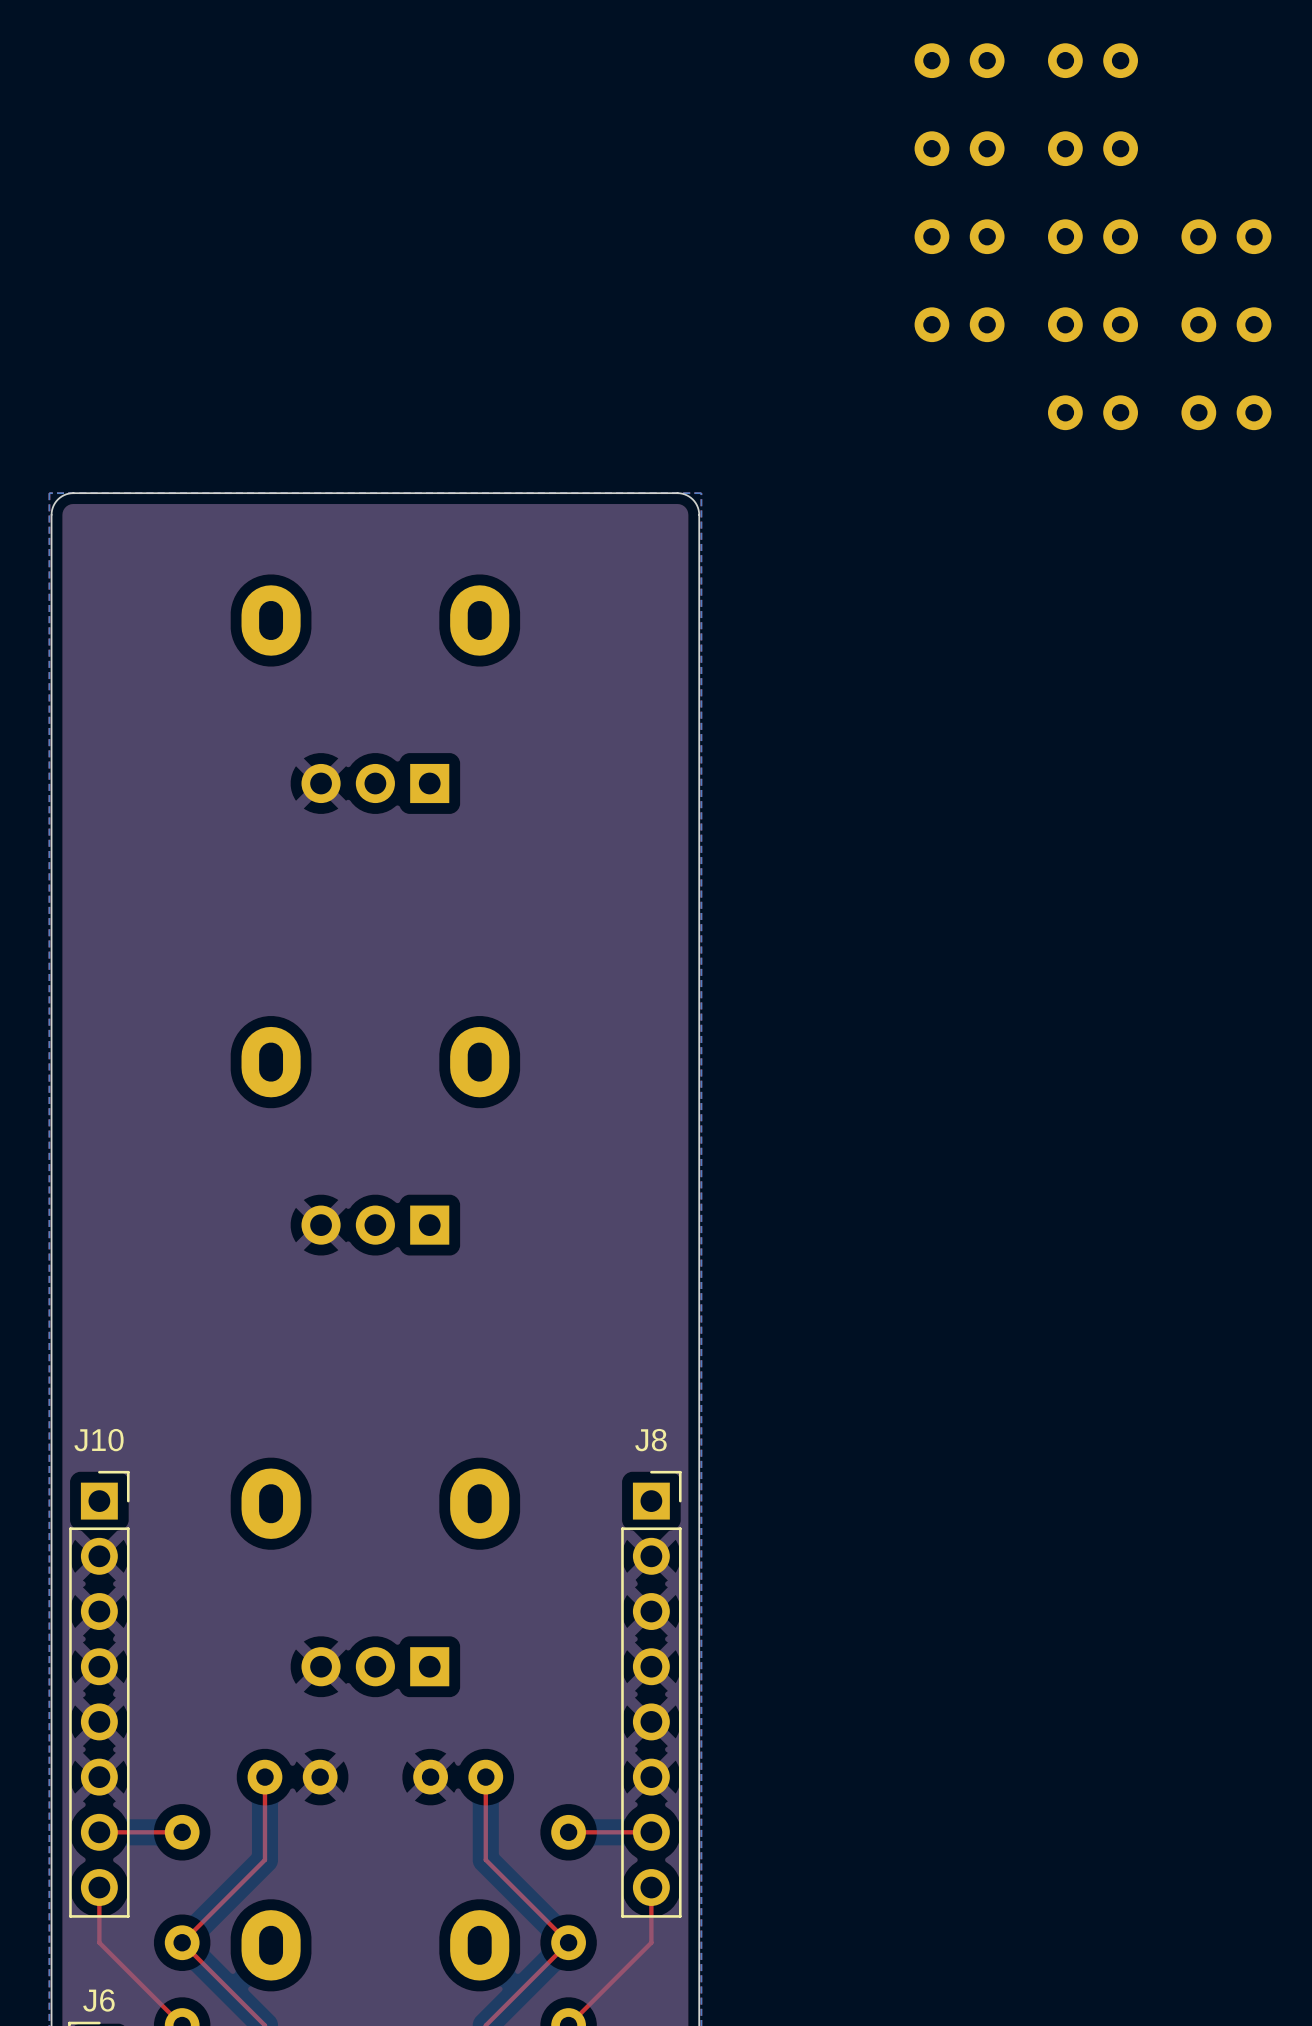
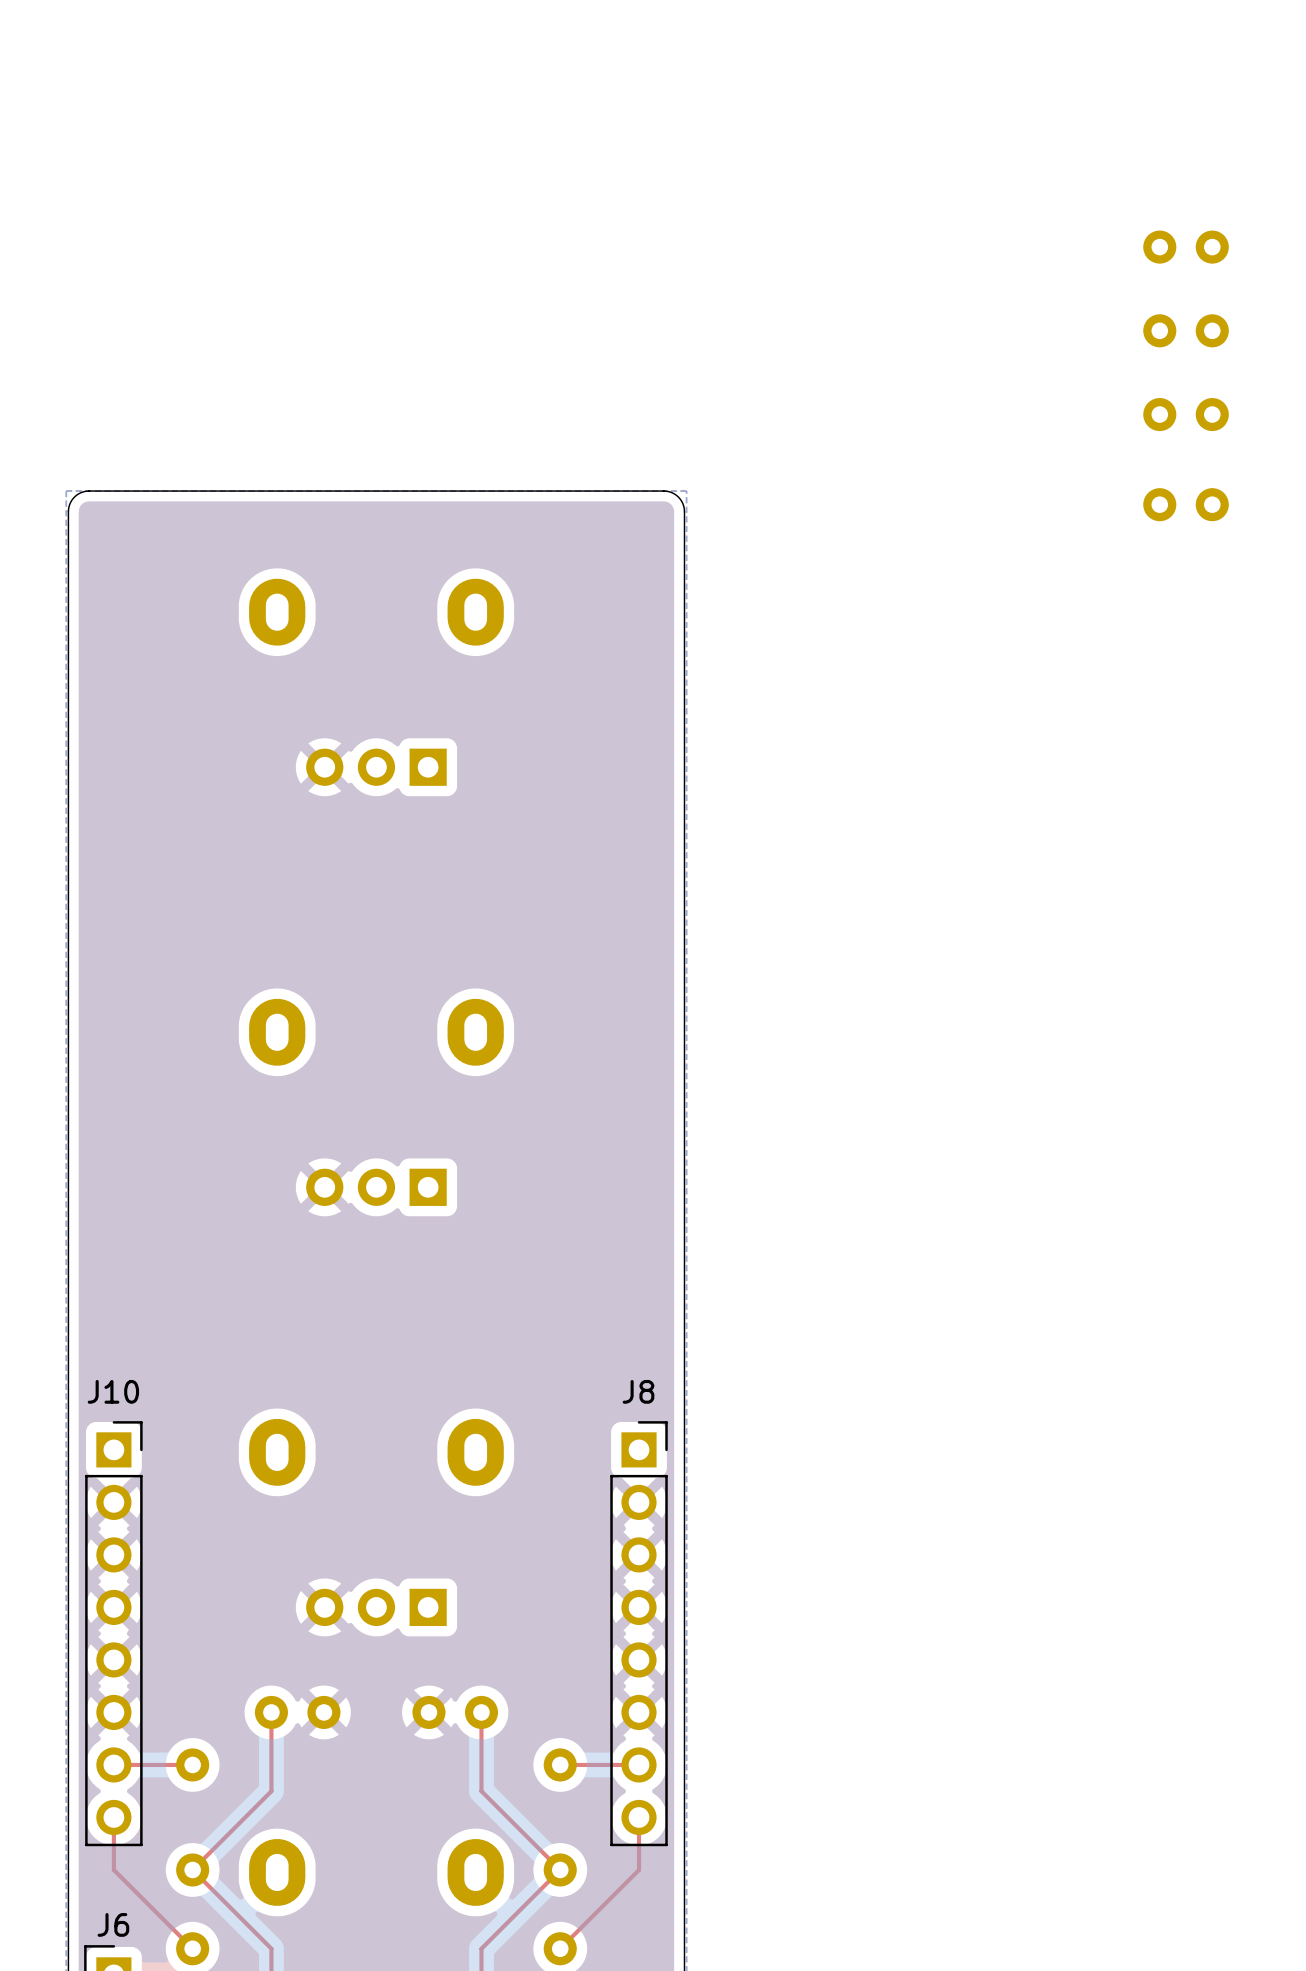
part: (959, 60) -> none
part: (1093, 60) -> none
part: (959, 148) -> none
part: (1093, 148) -> none
part: (959, 236) -> none
part: (1093, 236) -> none
part: (959, 324) -> none
part: (1093, 324) -> none
part: (1093, 412) -> none
part: none -> (1186, 504)

